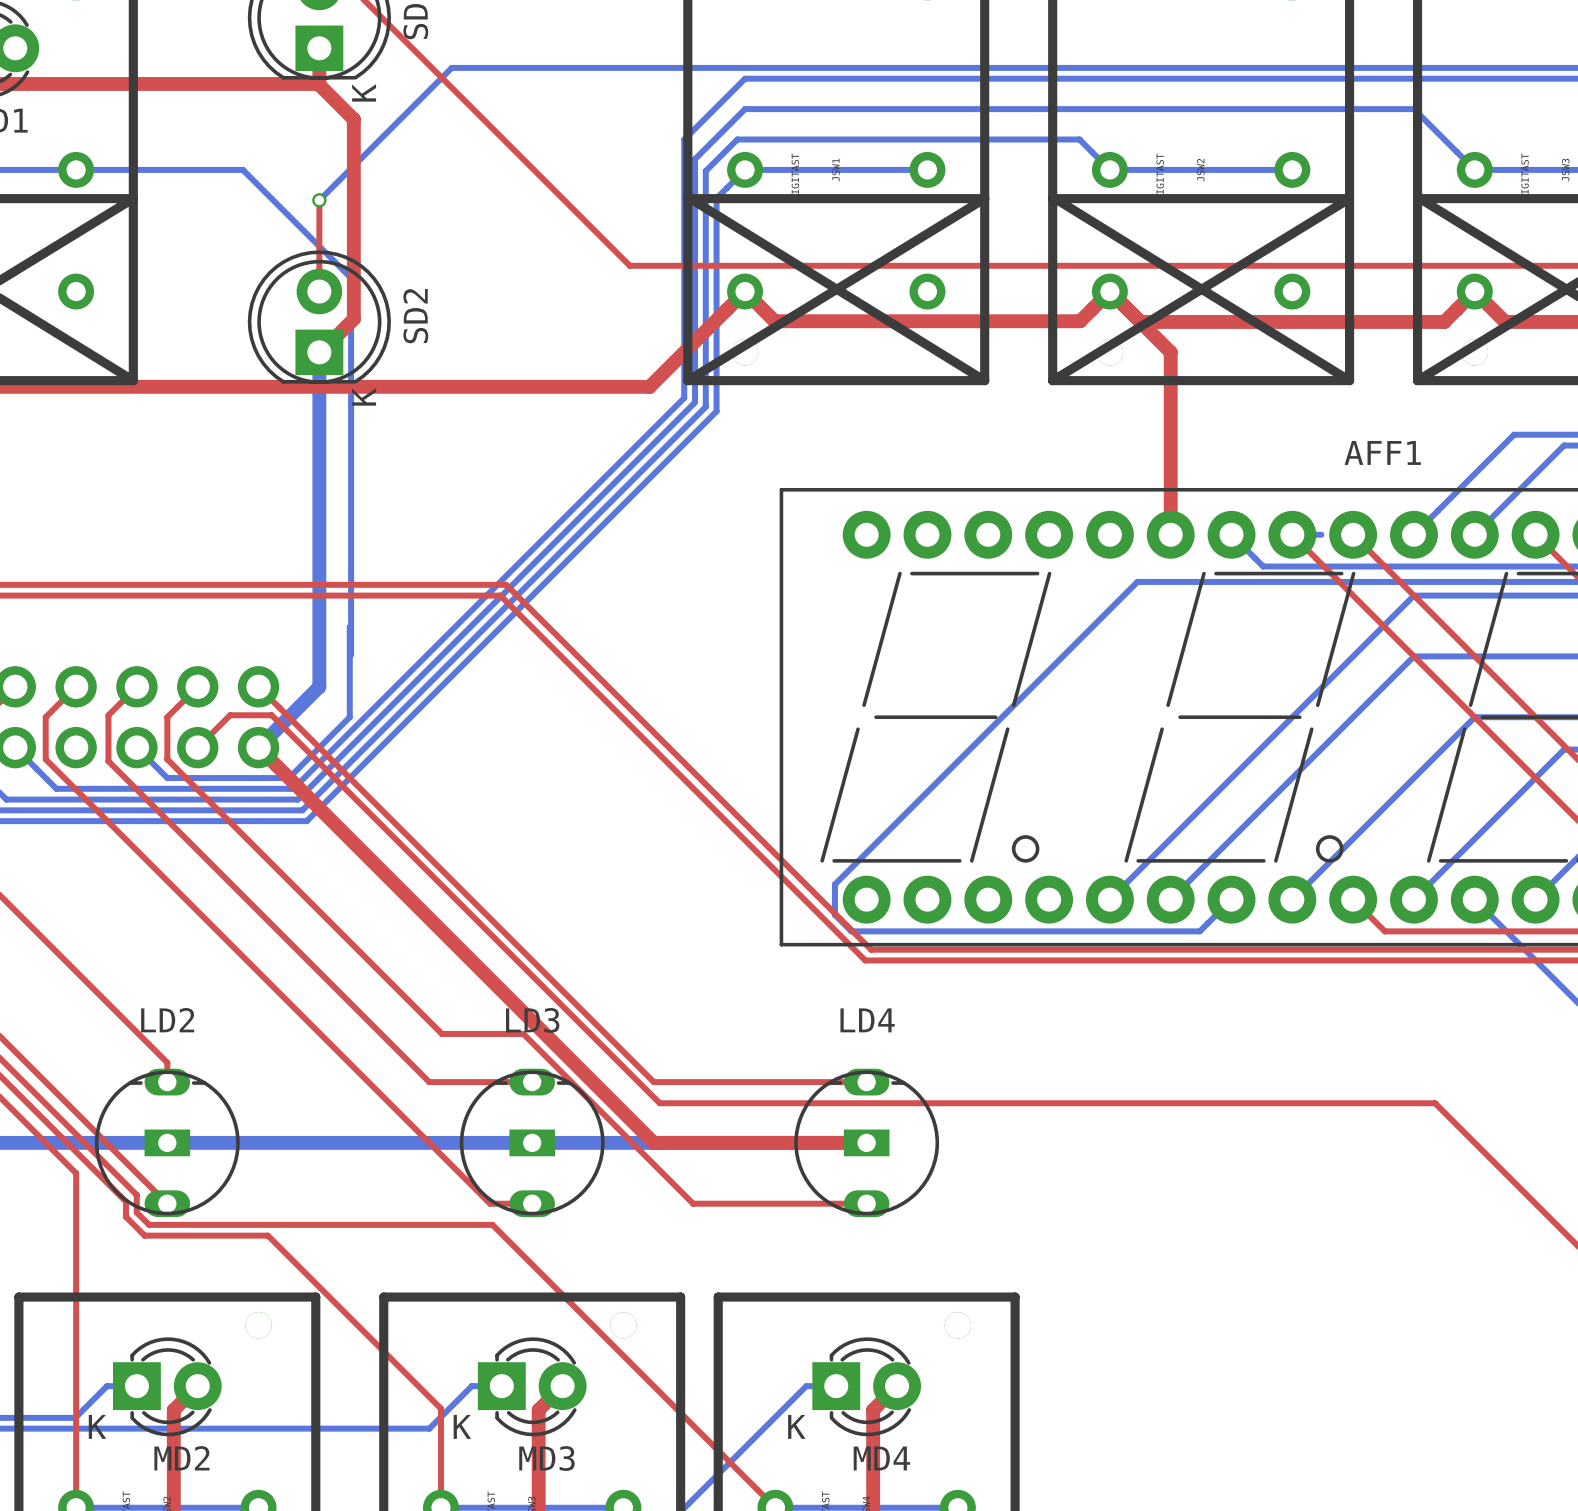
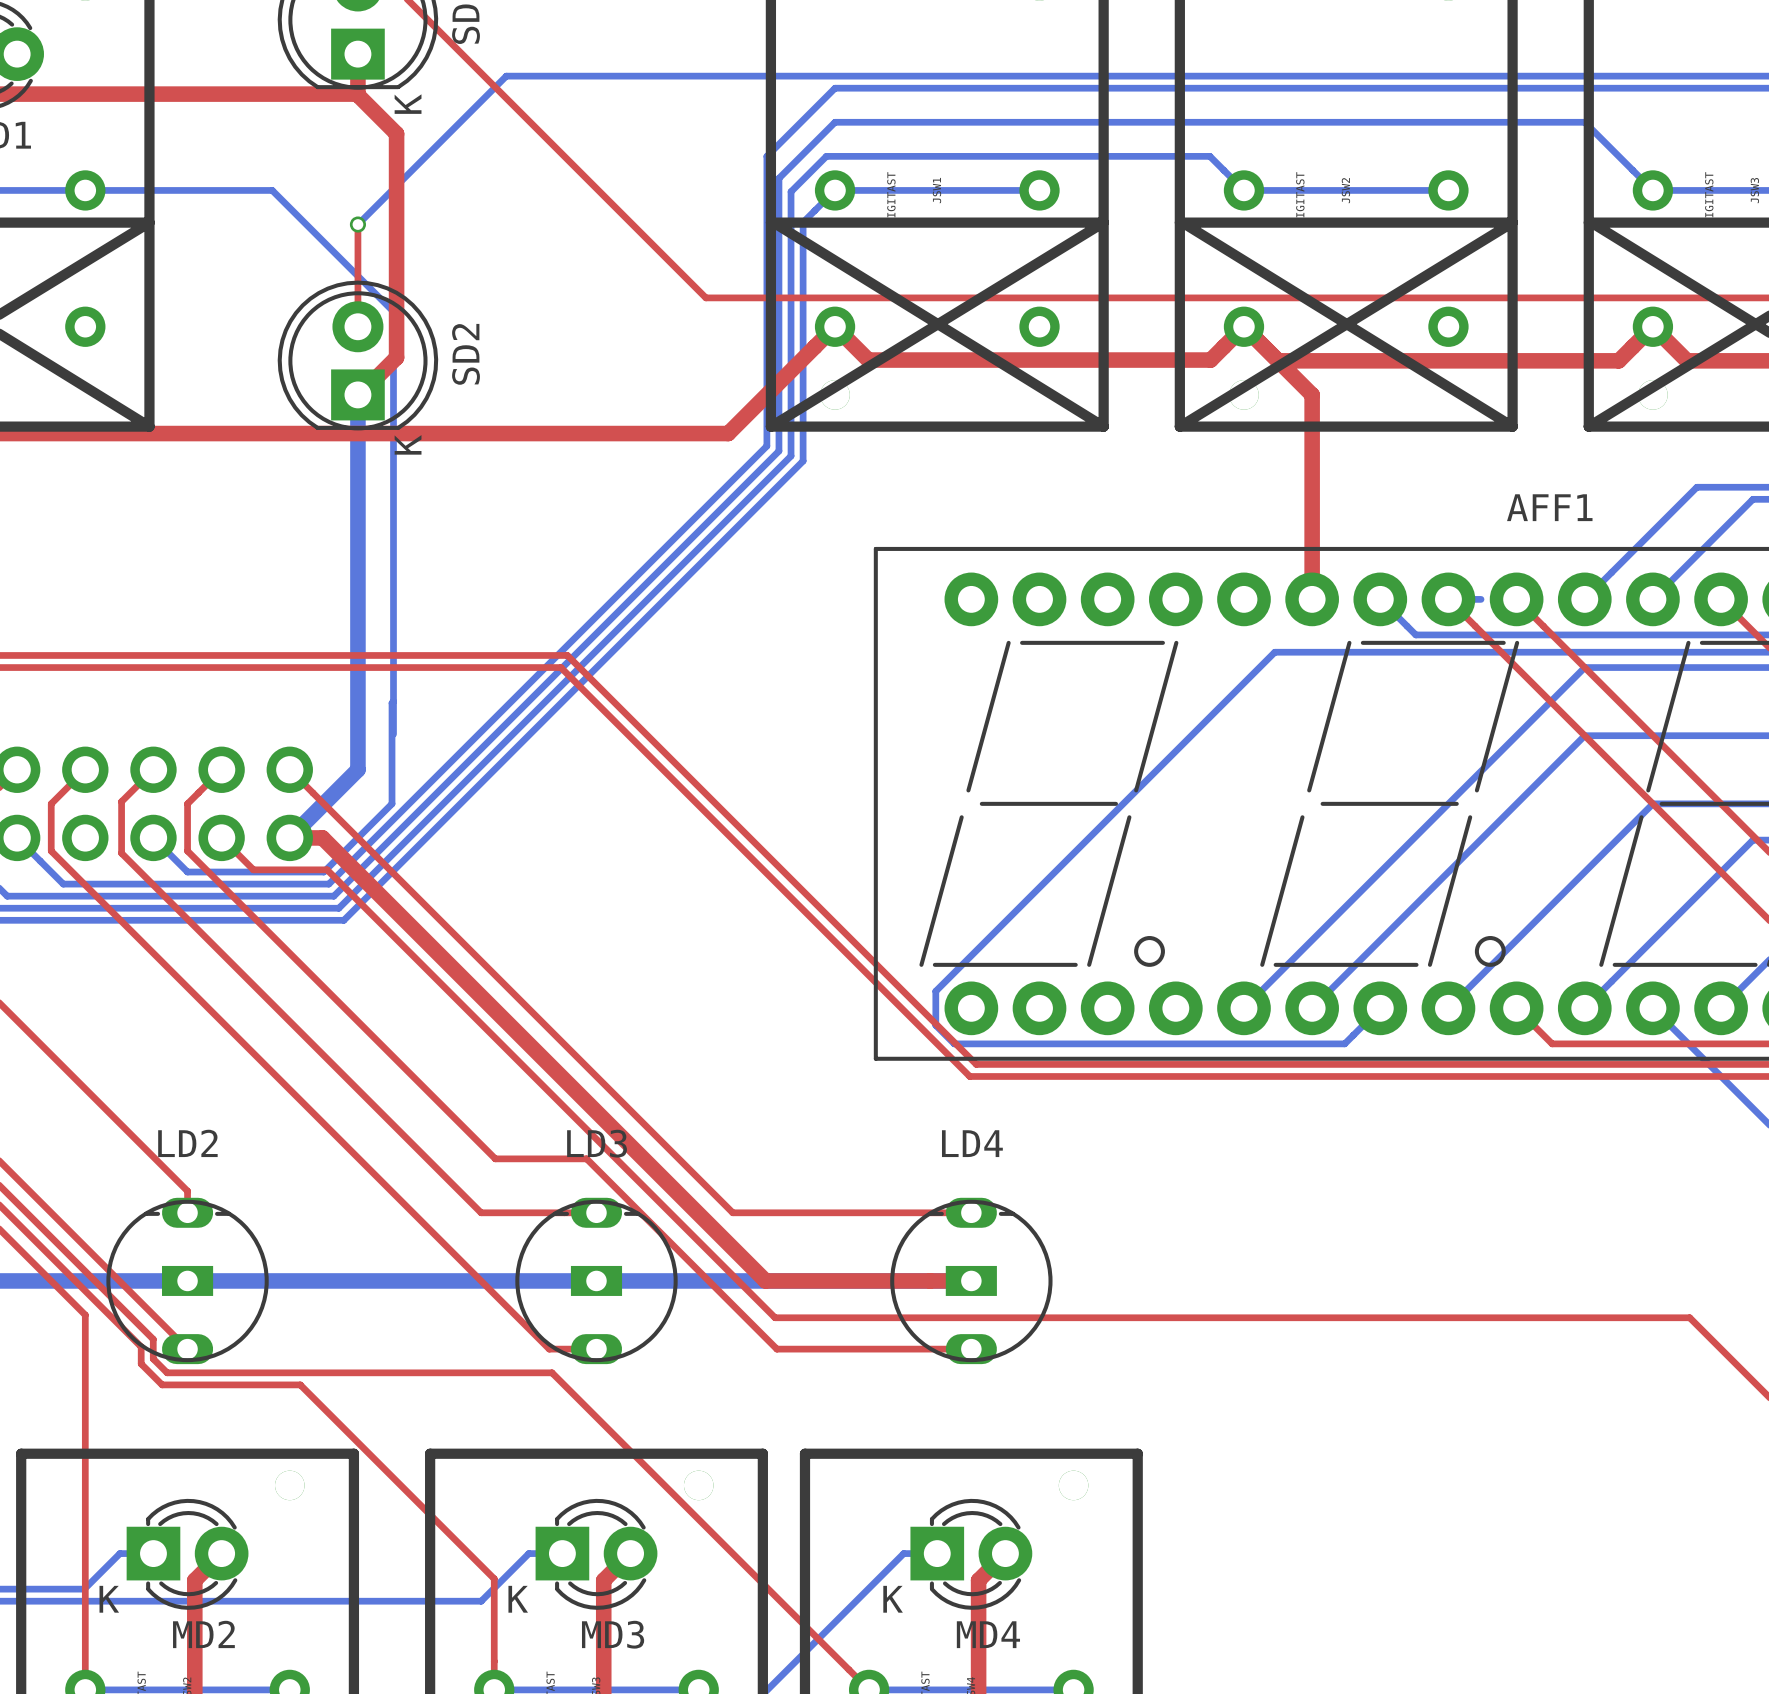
top track: (197, 747) (230, 715) (271, 715) (659, 1103) (1435, 1103) (1507, 1175) -> (221, 837) (253, 869) (327, 869) (775, 1317) (1689, 1317)
top track: (258, 747) (653, 1142) (683, 1142) -> (289, 837) (322, 837) (765, 1280)

